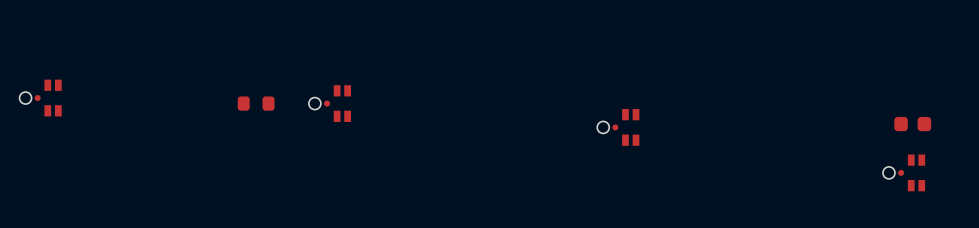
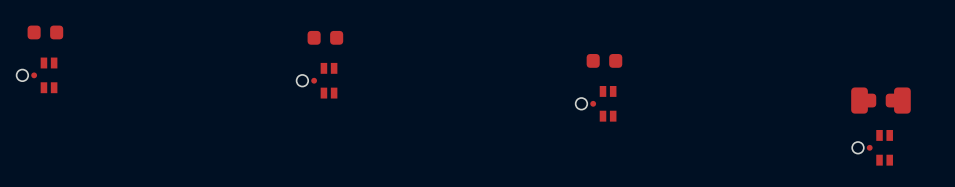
part: none -> (45, 32)
part: none -> (325, 37)
part: none -> (604, 60)
part: (256, 103) -> none
part: none -> (880, 100)

